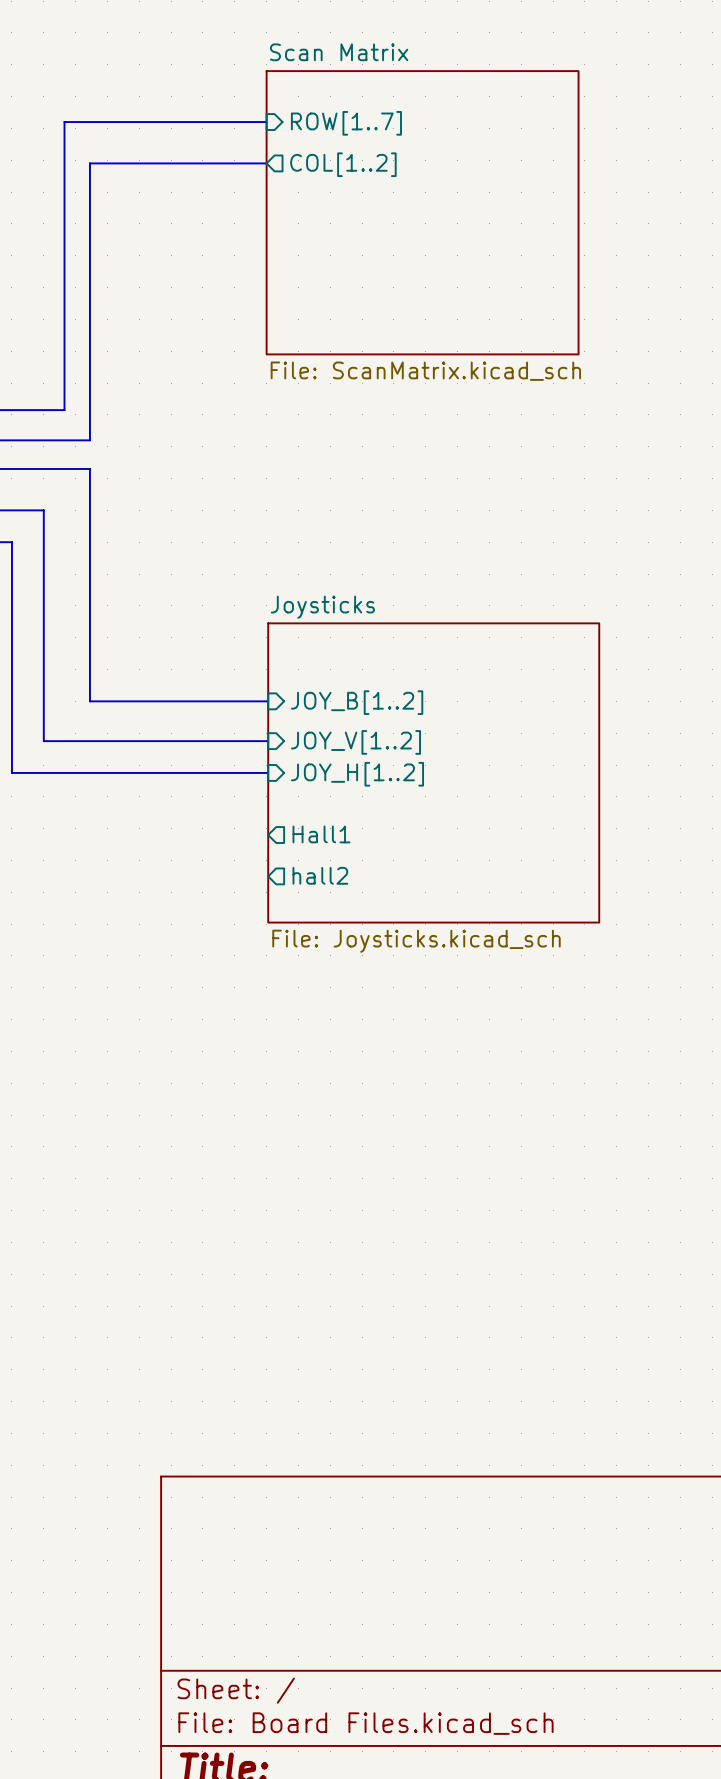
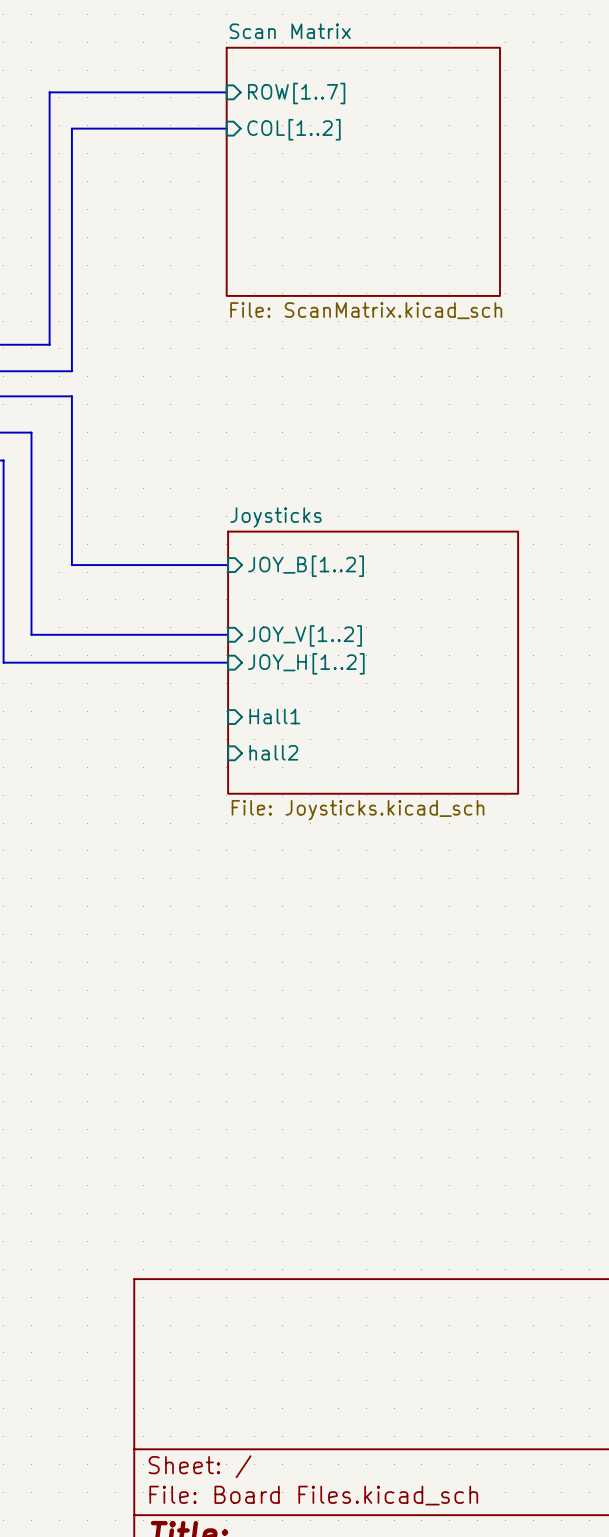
sheet pin shape: output (343, 164) -> input (293, 129)
bus: (89, 661) (89, 701) (268, 701) -> (71, 565) (228, 565)
sheet pin position: JOY_B[1..2] (357, 702) -> JOY_B[1..2] (306, 566)
sheet pin shape: output (321, 834) -> input (274, 716)
sheet pin shape: output (320, 875) -> input (273, 752)

